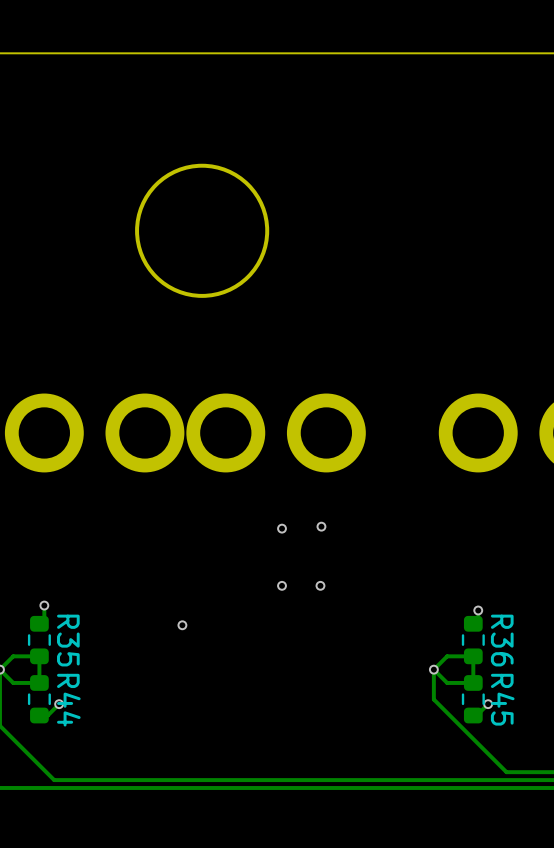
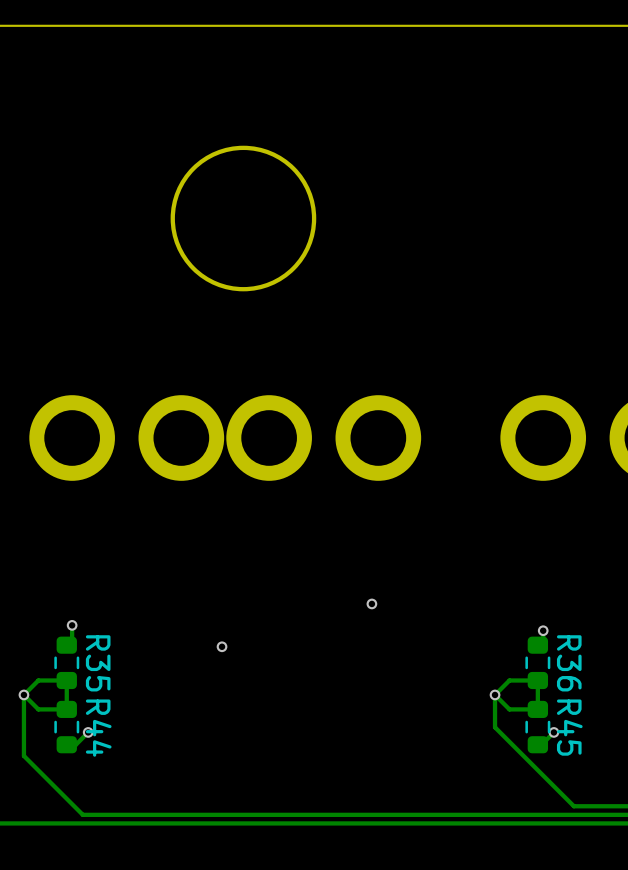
via: (321, 526) -> none
via: (282, 528) -> none
via: (282, 585) -> none

